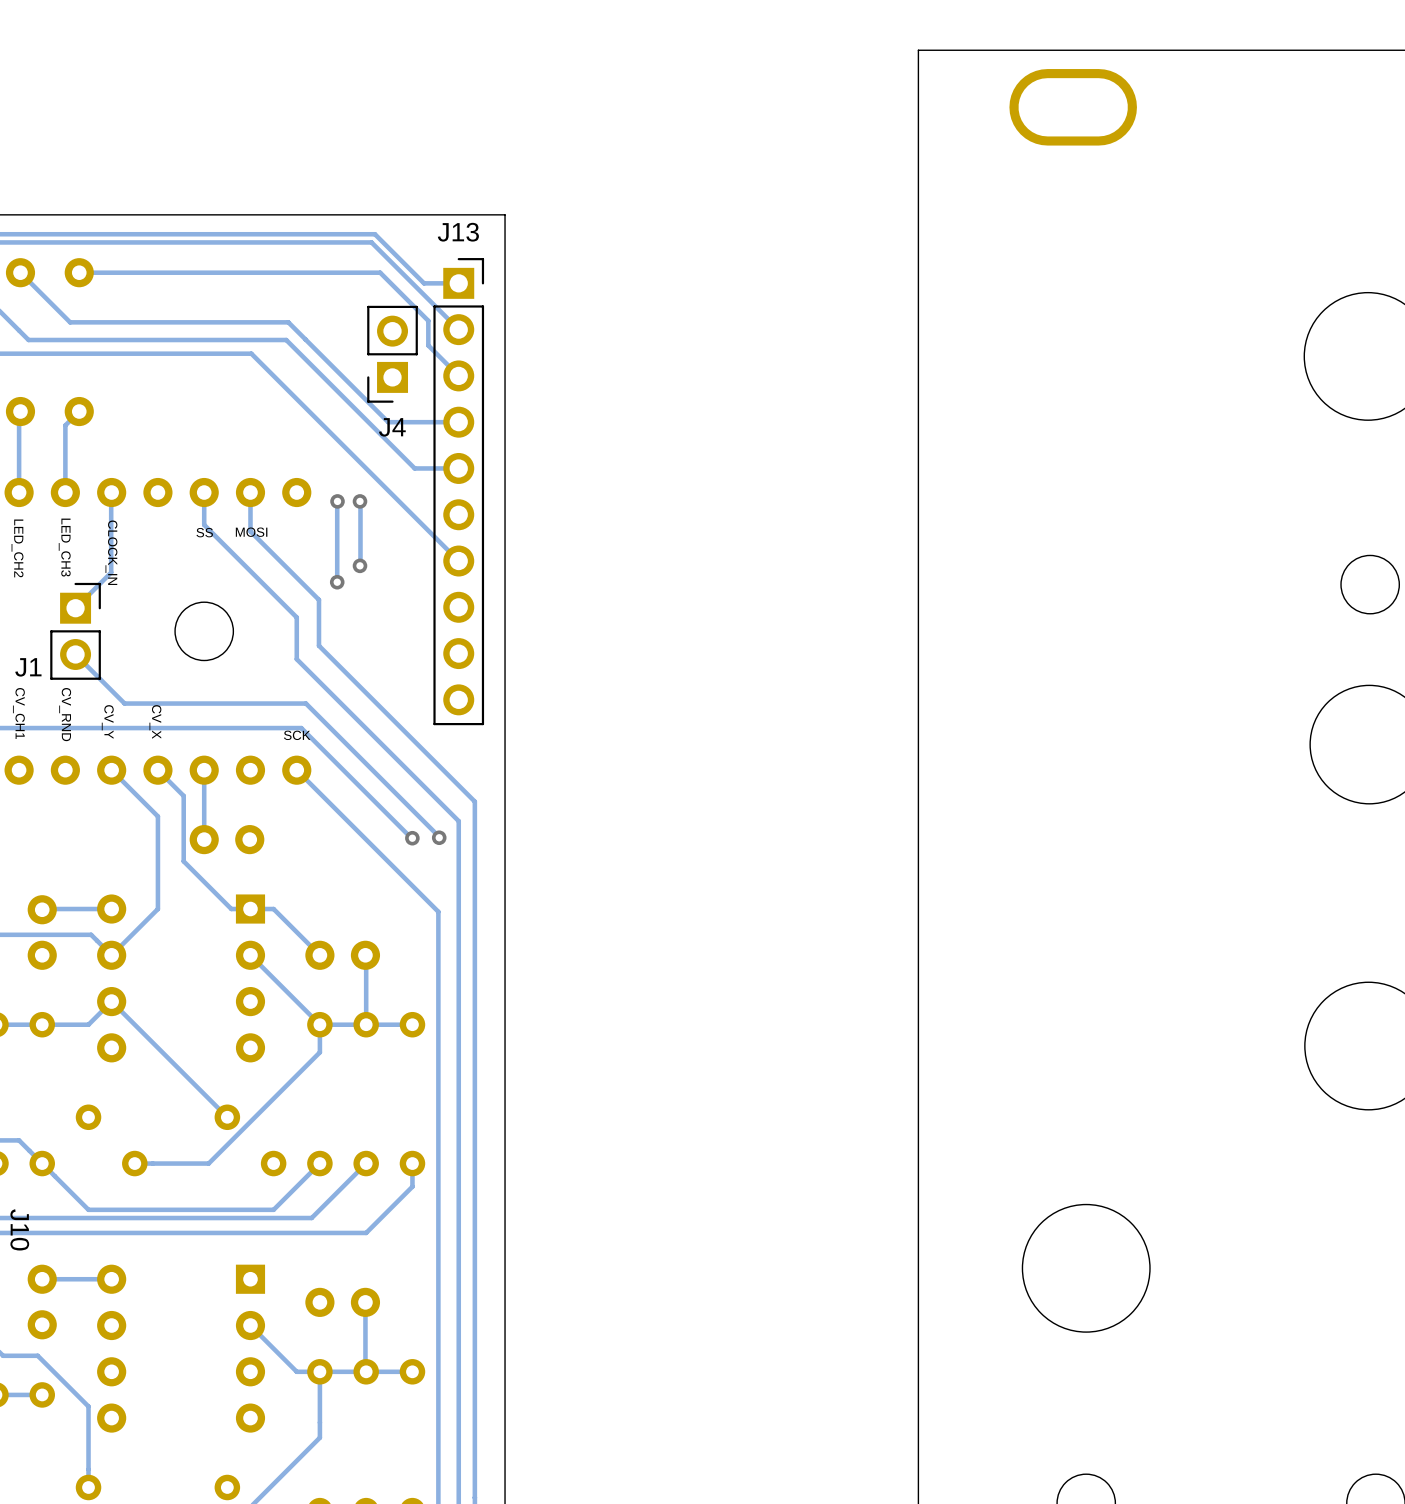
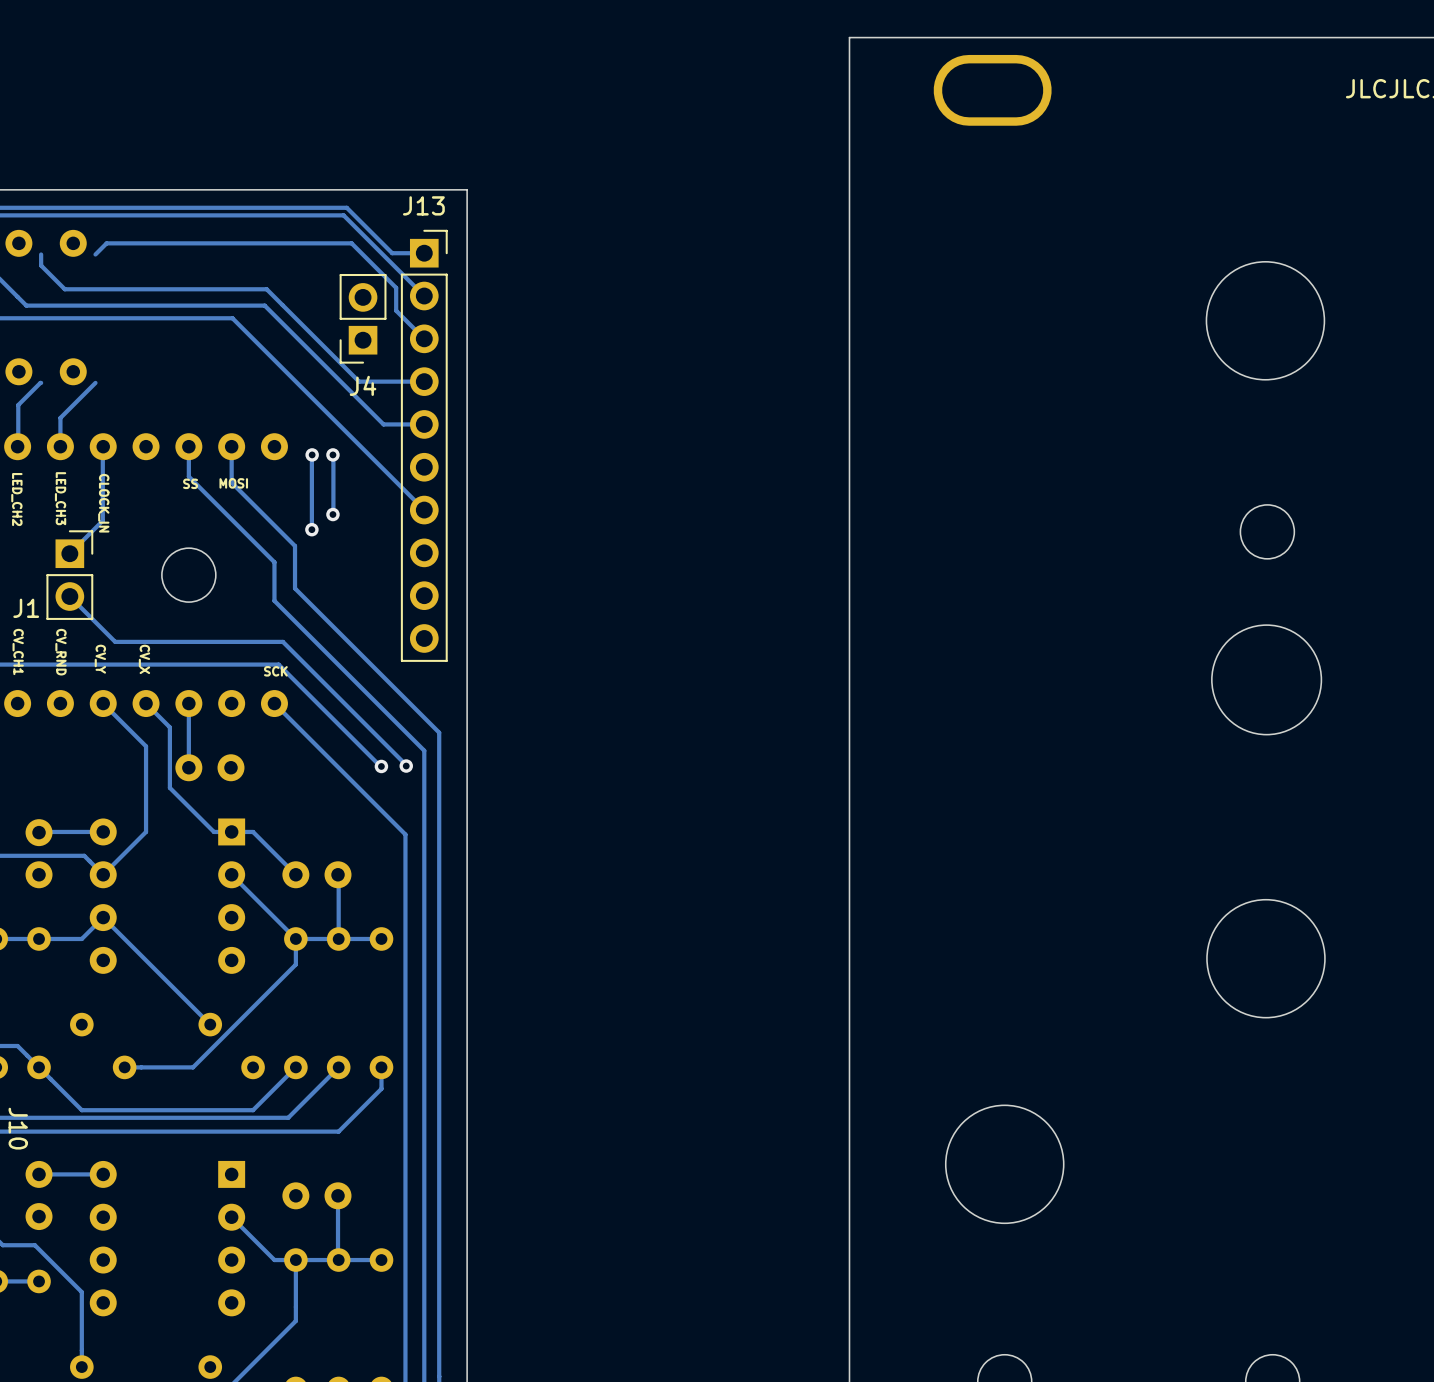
track: (20, 272) (44, 296) -> (41, 254) (41, 265)
track: (115, 272) (79, 272) -> (106, 243) (95, 254)
track: (20, 411) (19, 492) -> (41, 382) (18, 405) (17, 446)
track: (79, 411) (65, 425) (65, 461) -> (95, 382) (60, 417)

